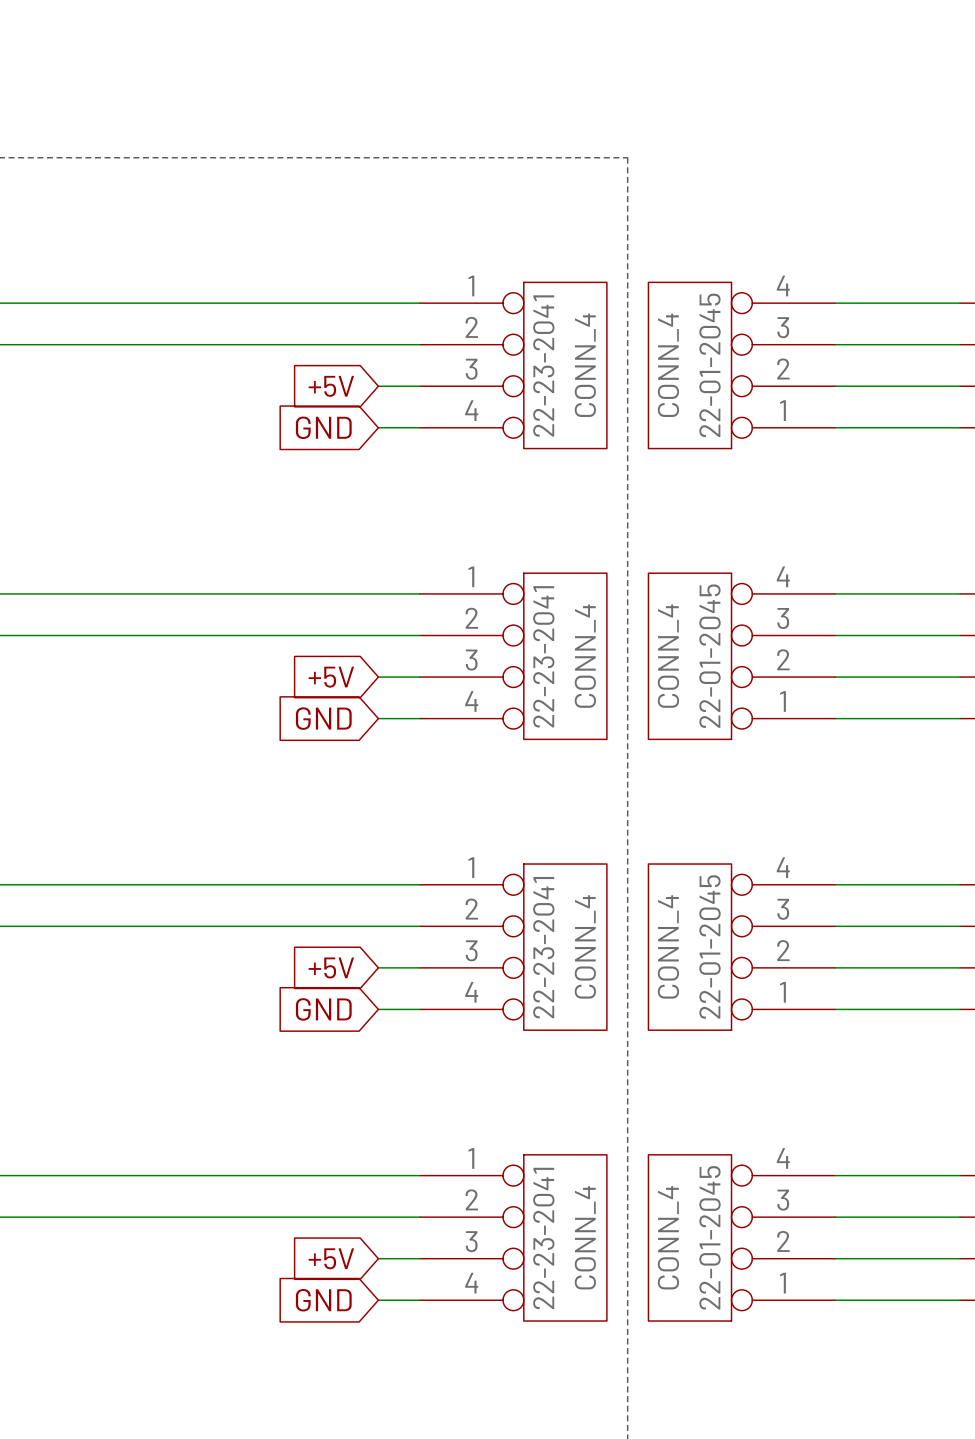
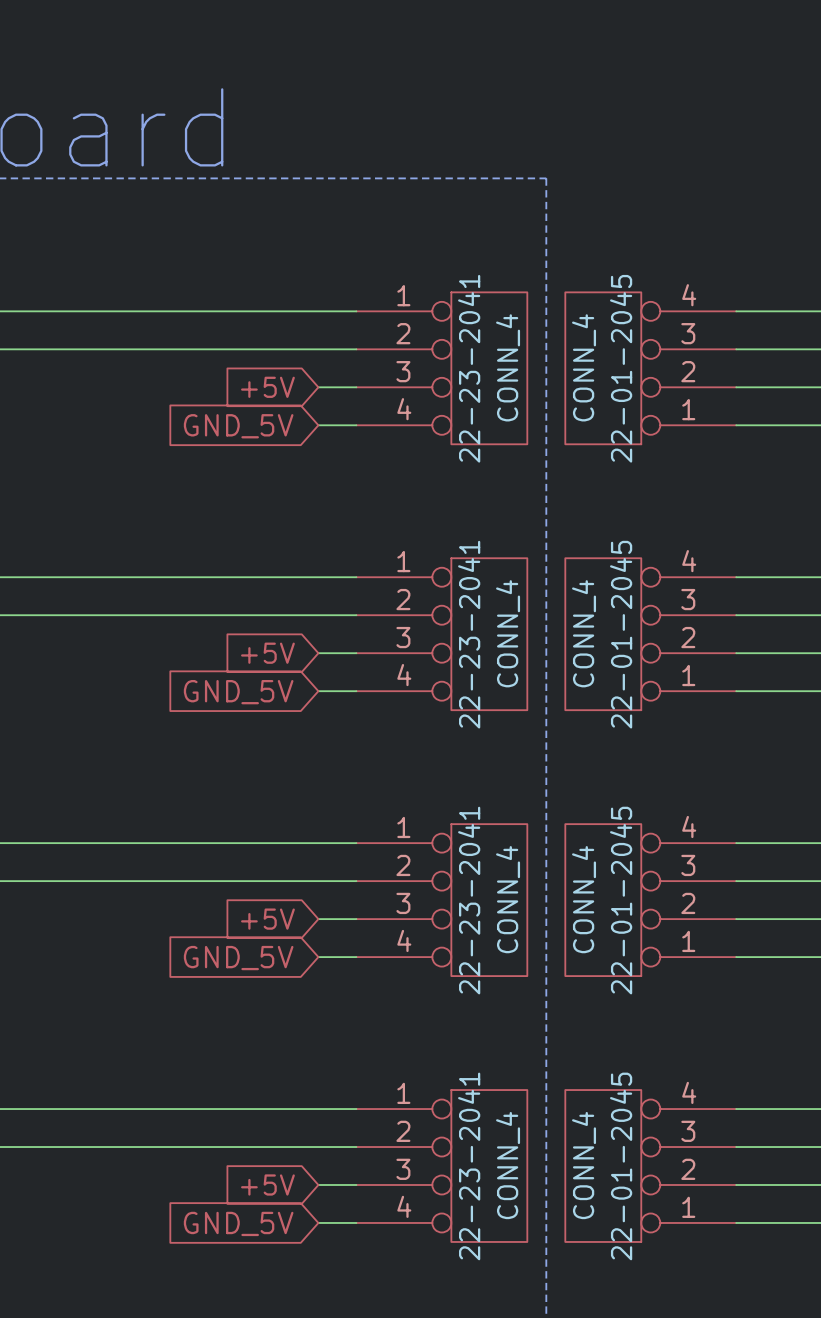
global label: GND (323, 427) -> GND_5V (238, 426)
global label: GND (323, 718) -> GND_5V (238, 692)
global label: GND (323, 1009) -> GND_5V (238, 958)
global label: GND (323, 1300) -> GND_5V (238, 1223)

